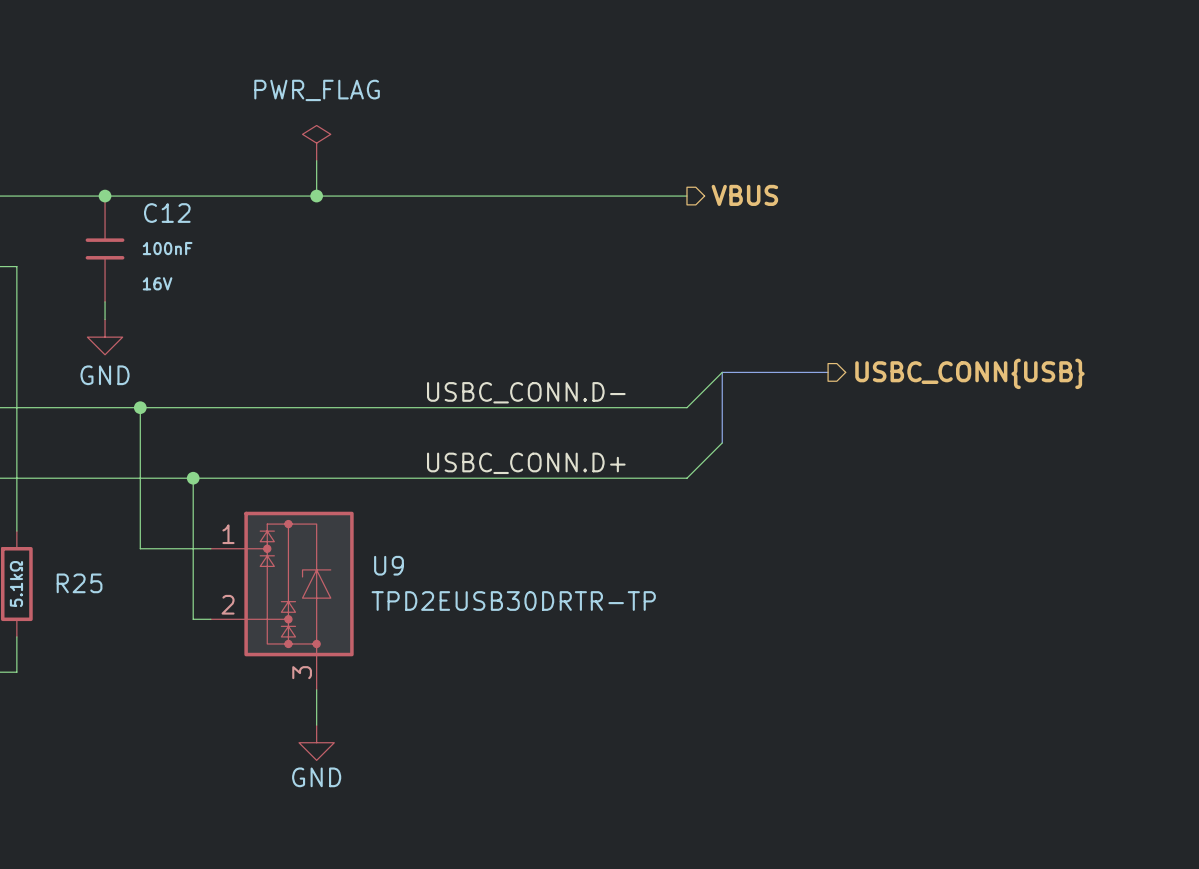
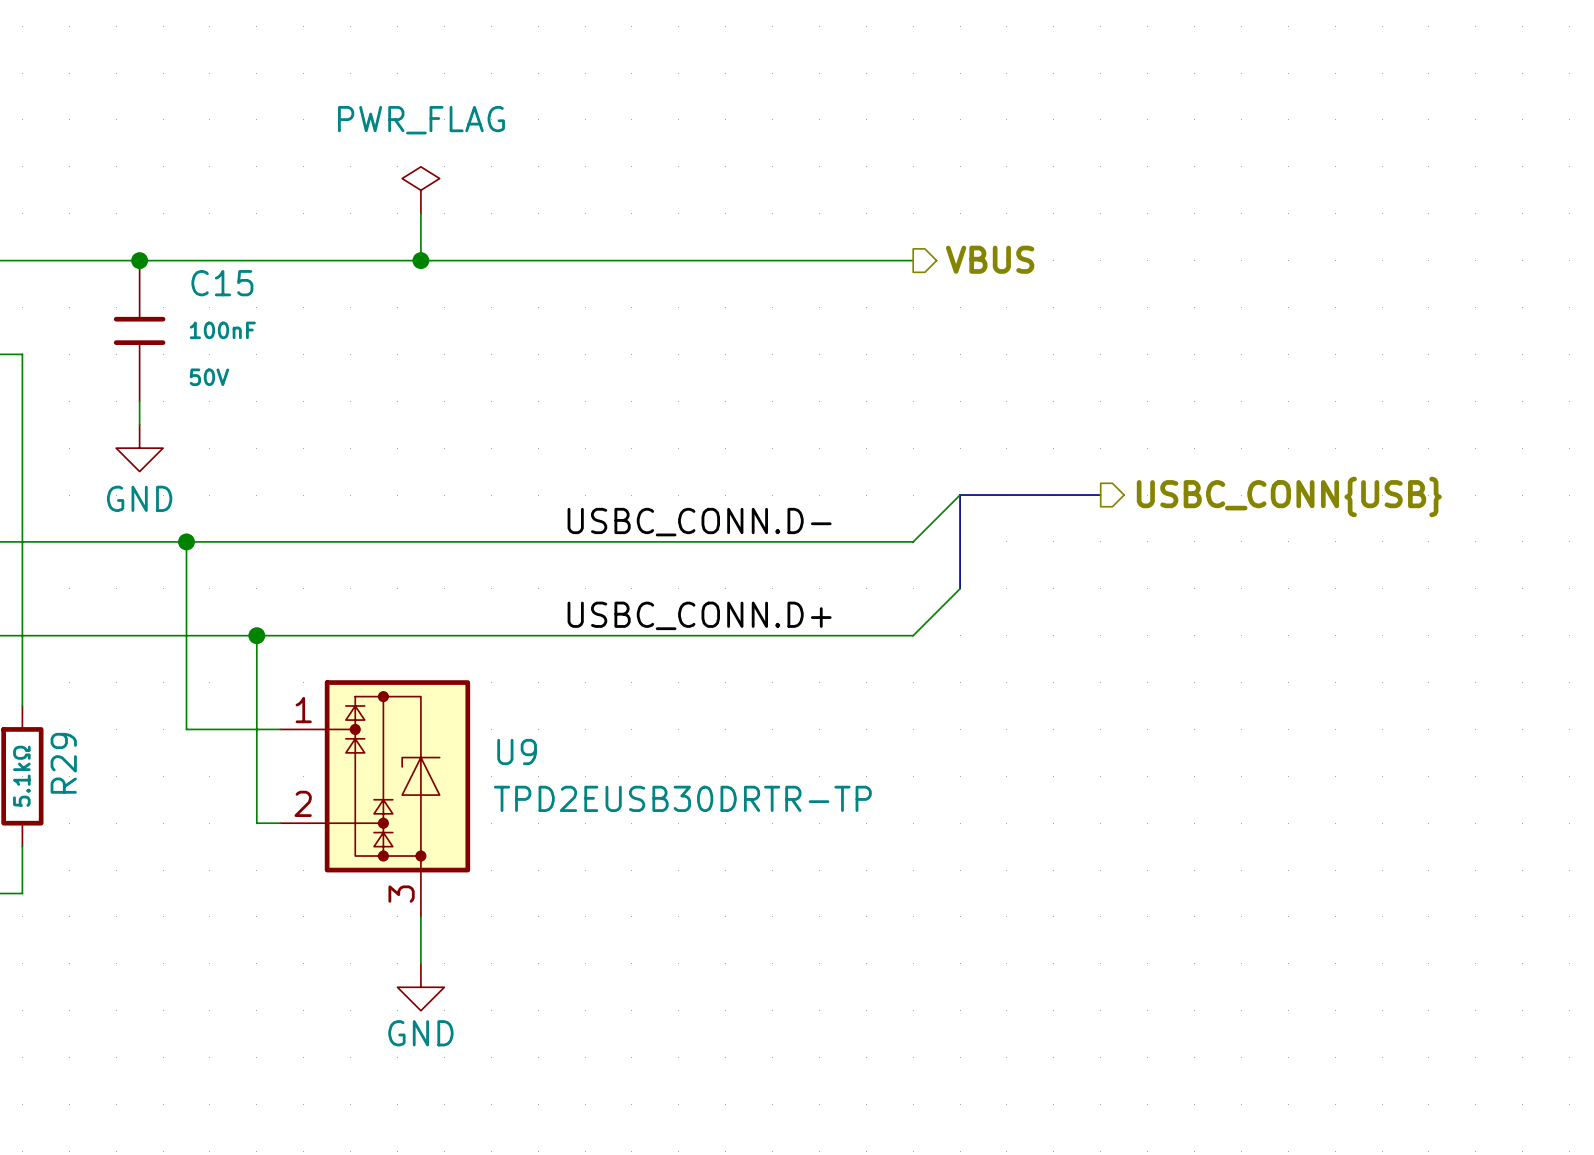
C12 name: C12 (167, 213) -> C15 (222, 283)
C12 text: 16V (157, 283) -> 50V (209, 377)
R25 name: R25 (79, 583) -> R29 (63, 763)

